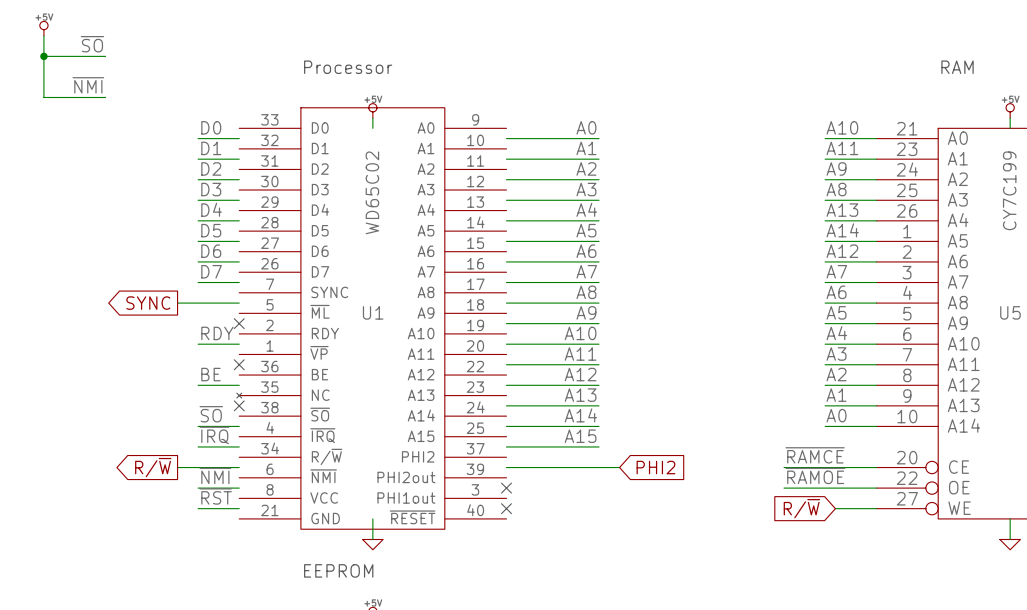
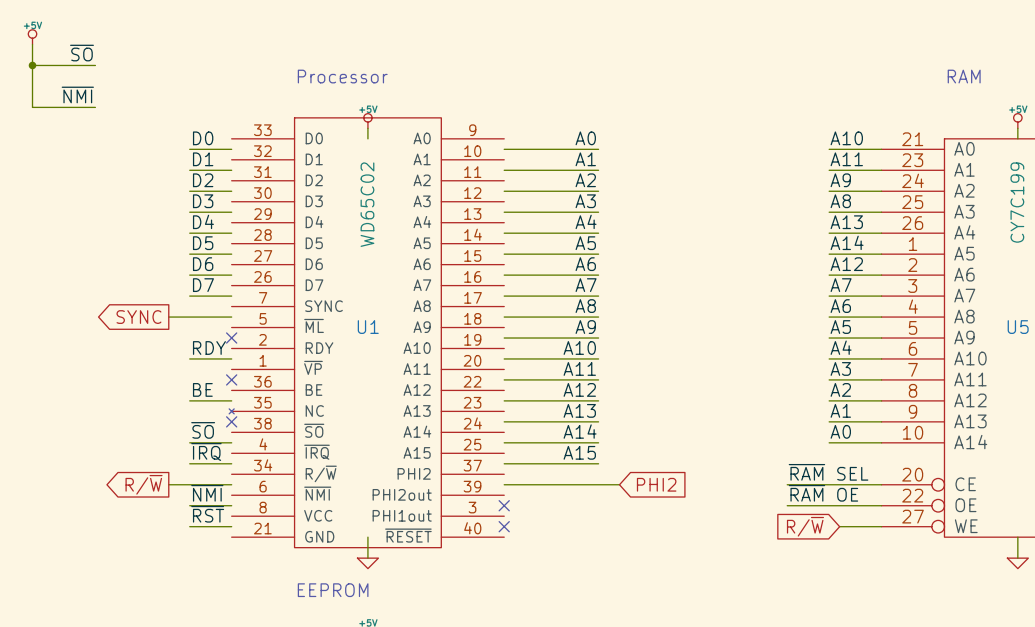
label: ~{RAMCE} (815, 455) -> ~{RAM} SEL (828, 472)
label: ~{RAMOE} (815, 475) -> ~{RAM} OE (823, 493)

